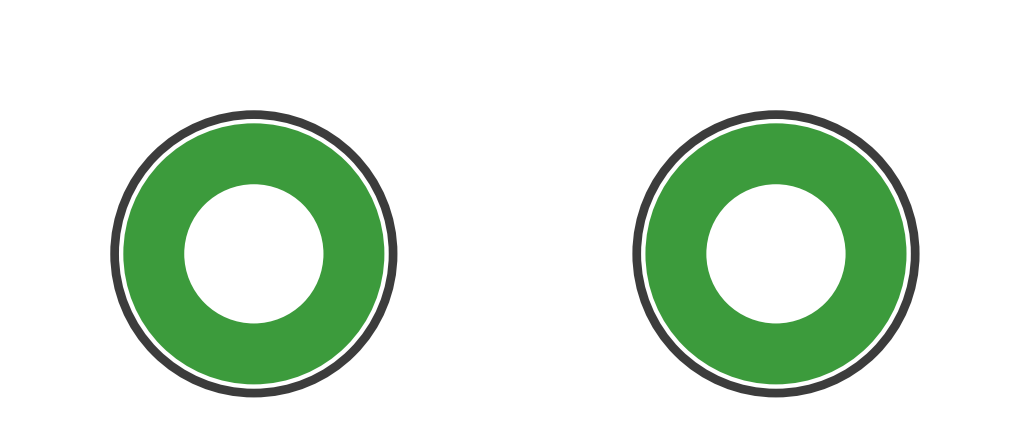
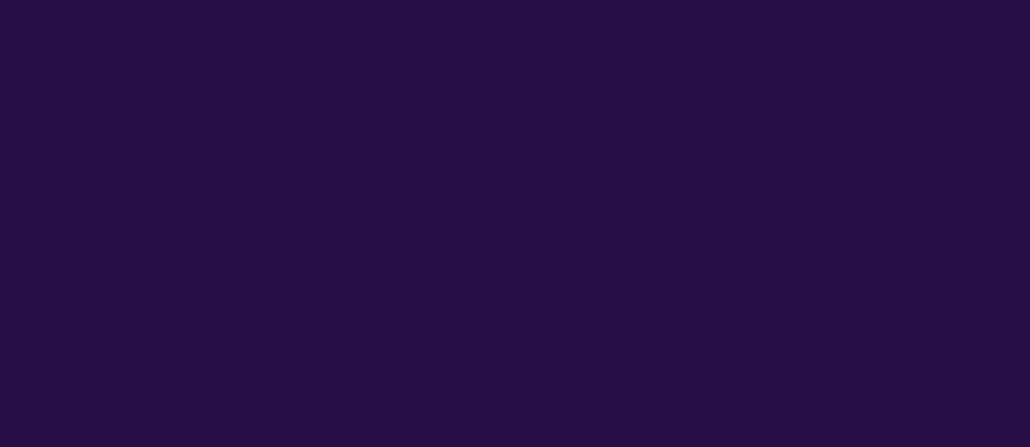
part: (253, 253) -> none
part: (775, 253) -> none

